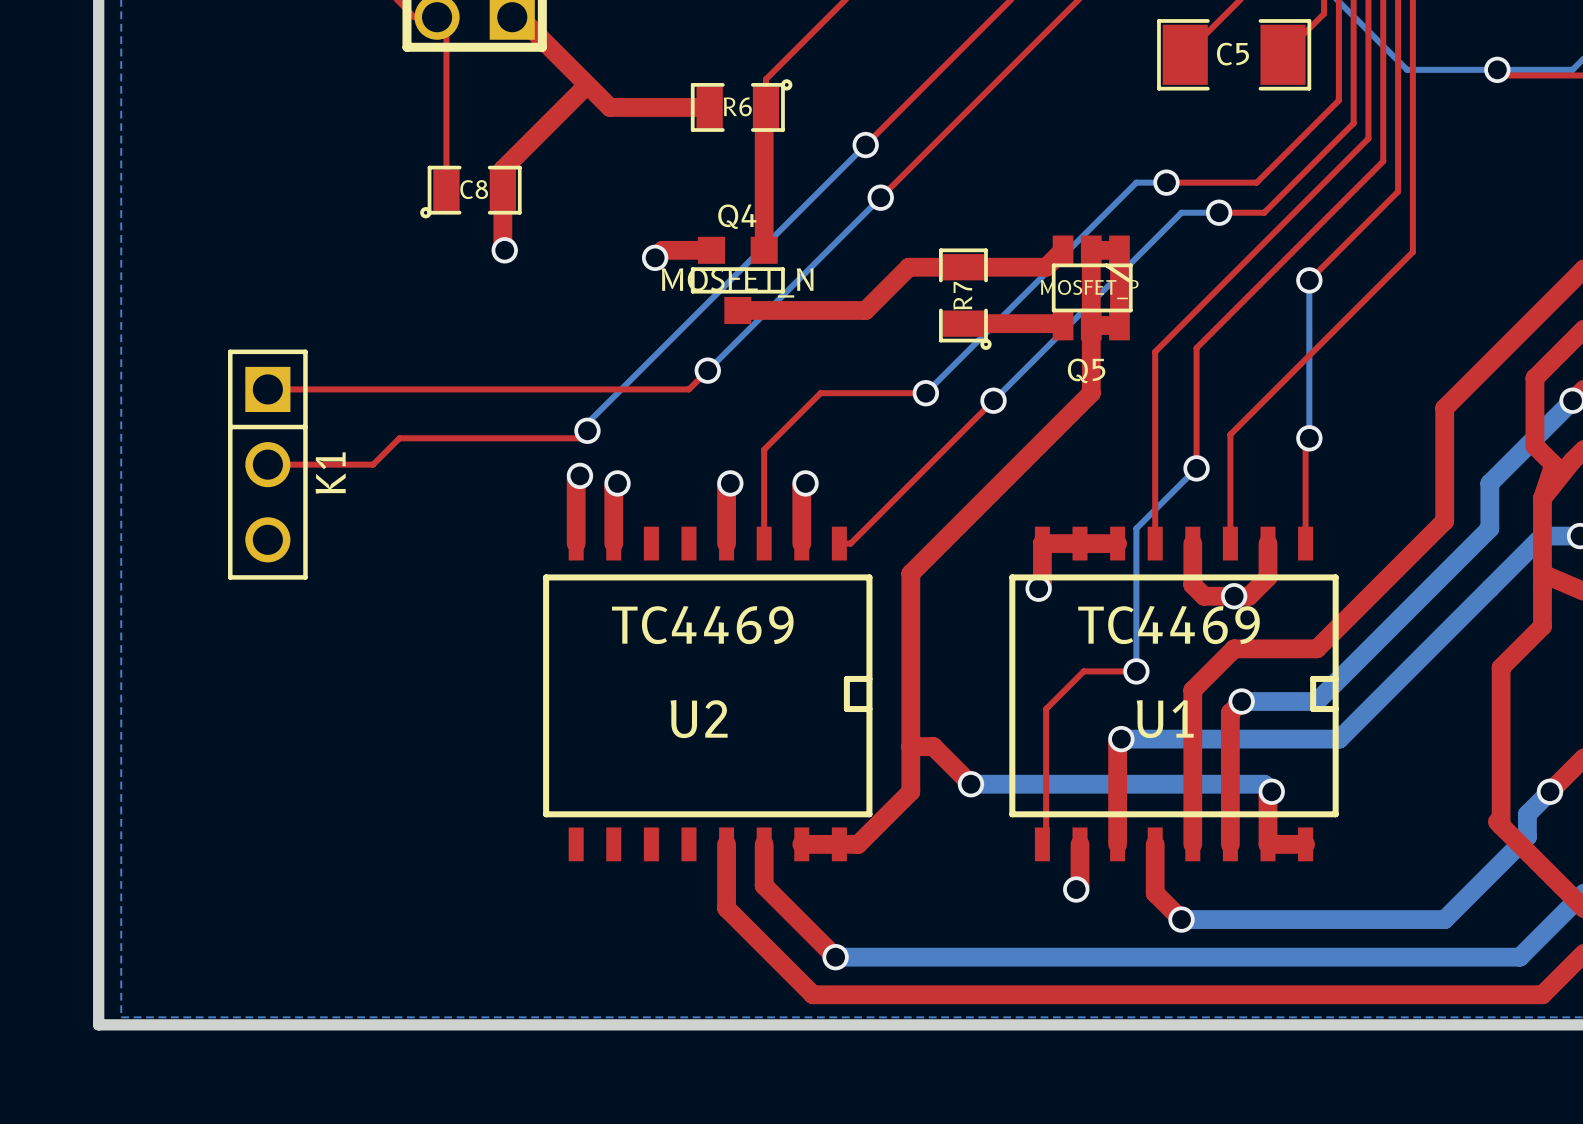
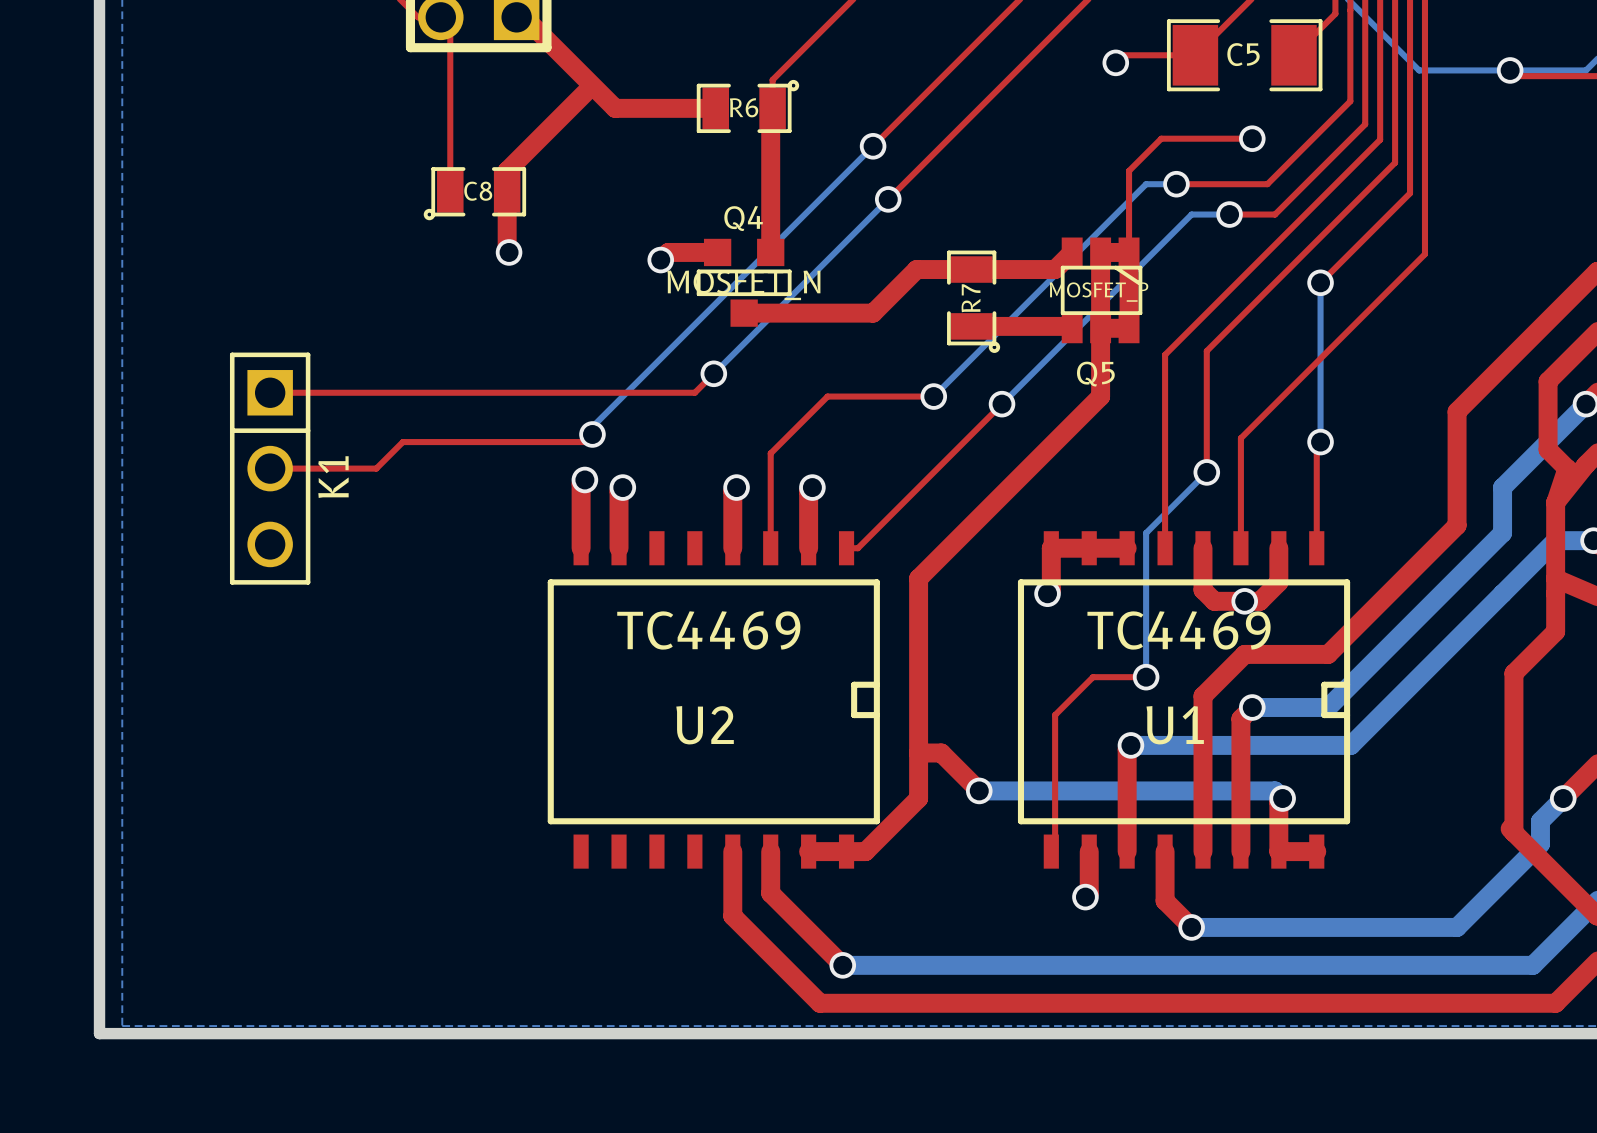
top track: none -> (1195, 55) (1123, 55) (1115, 62)
via: none -> (1115, 62)
top track: none -> (1252, 138) (1161, 138) (1129, 170) (1129, 252)
via: none -> (1252, 138)

